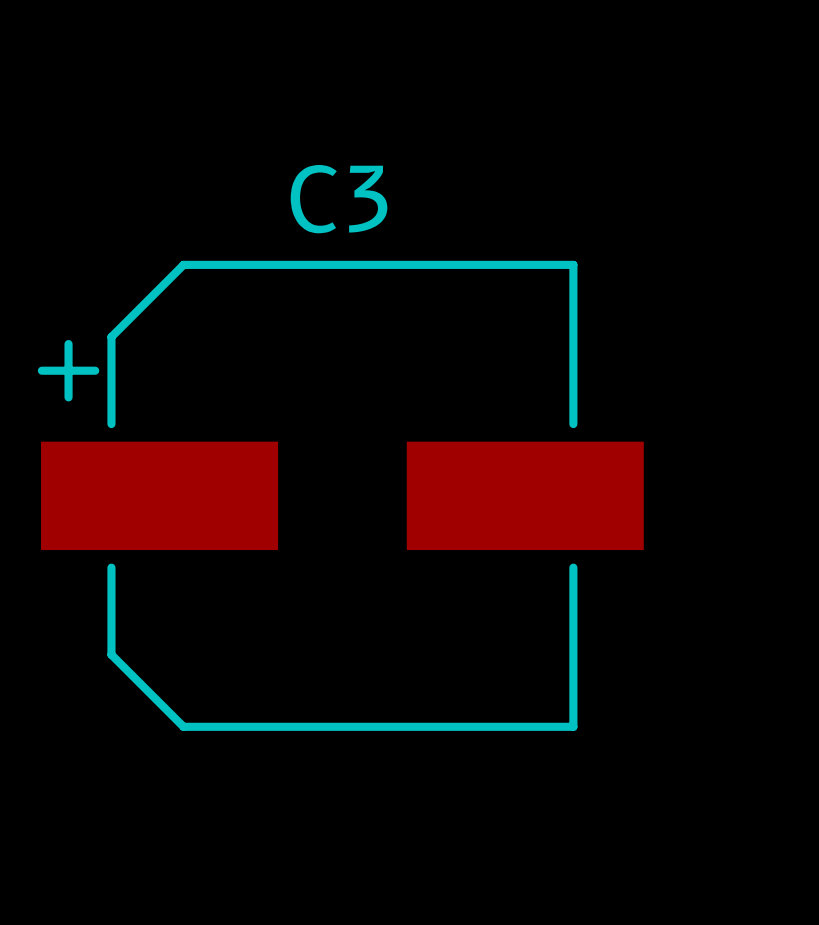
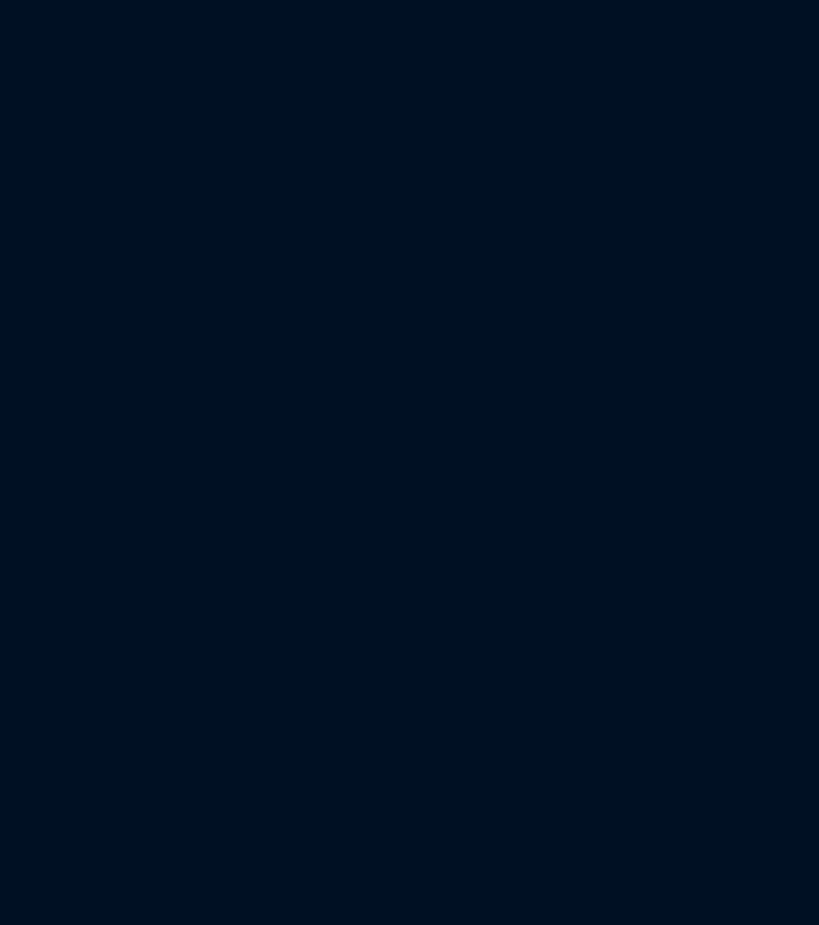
C3: (340, 495) -> none

